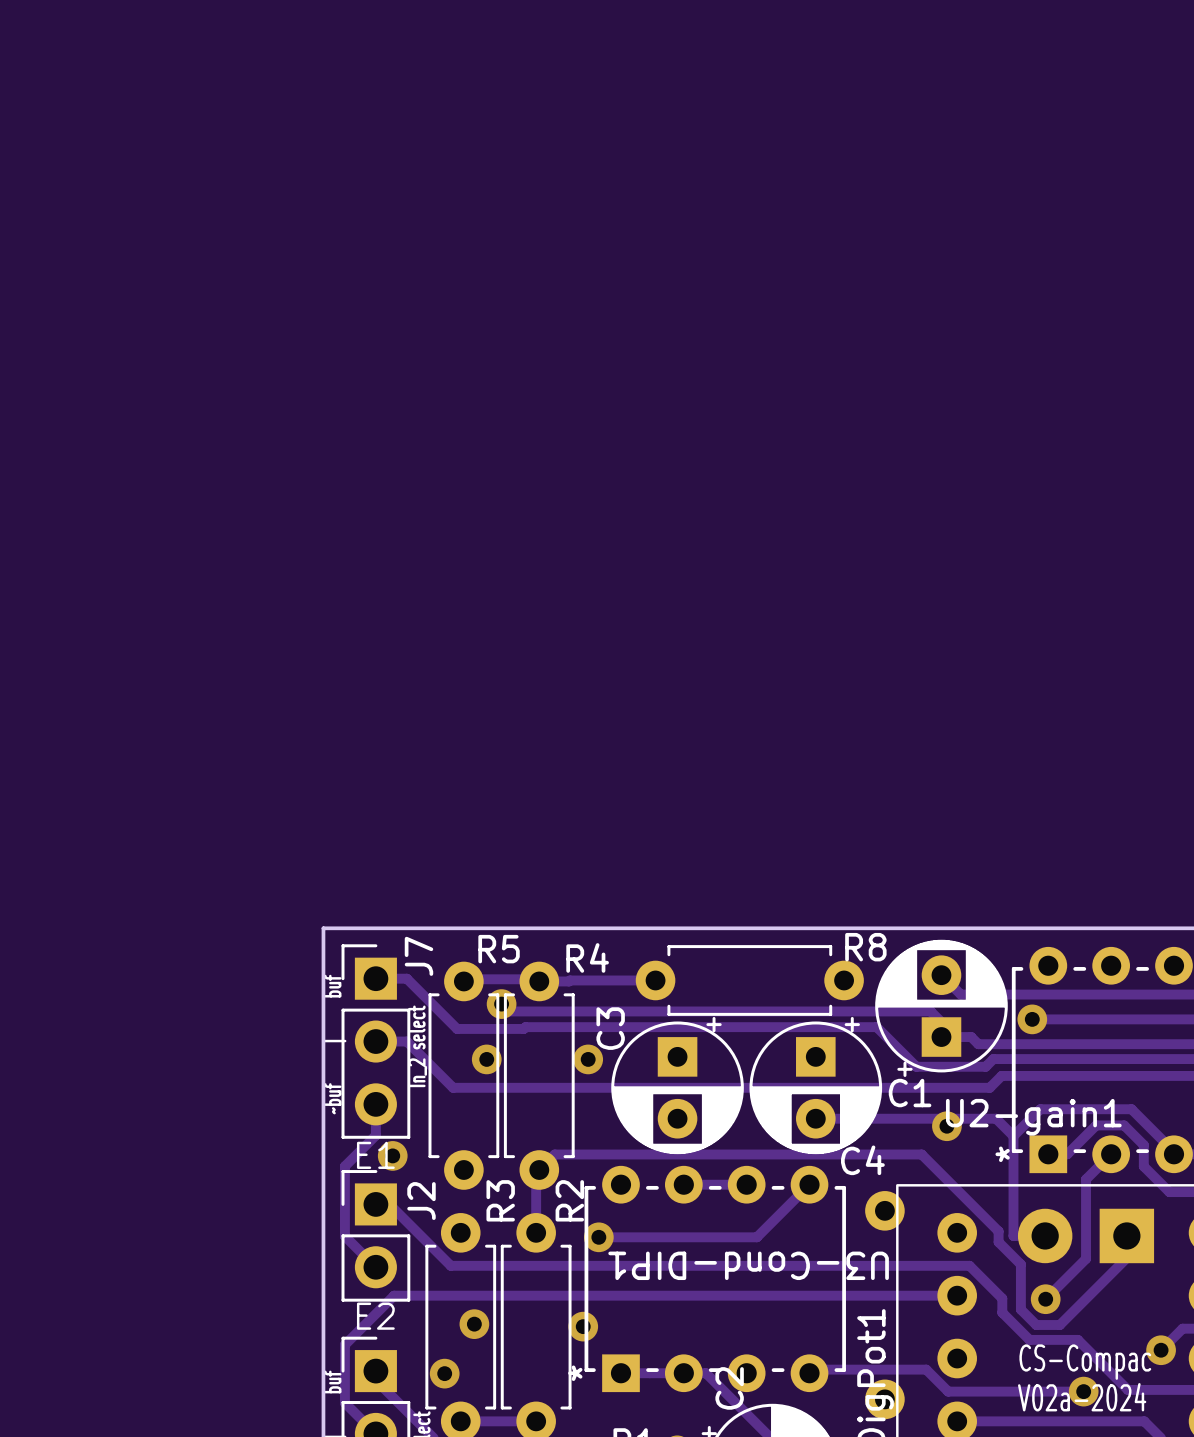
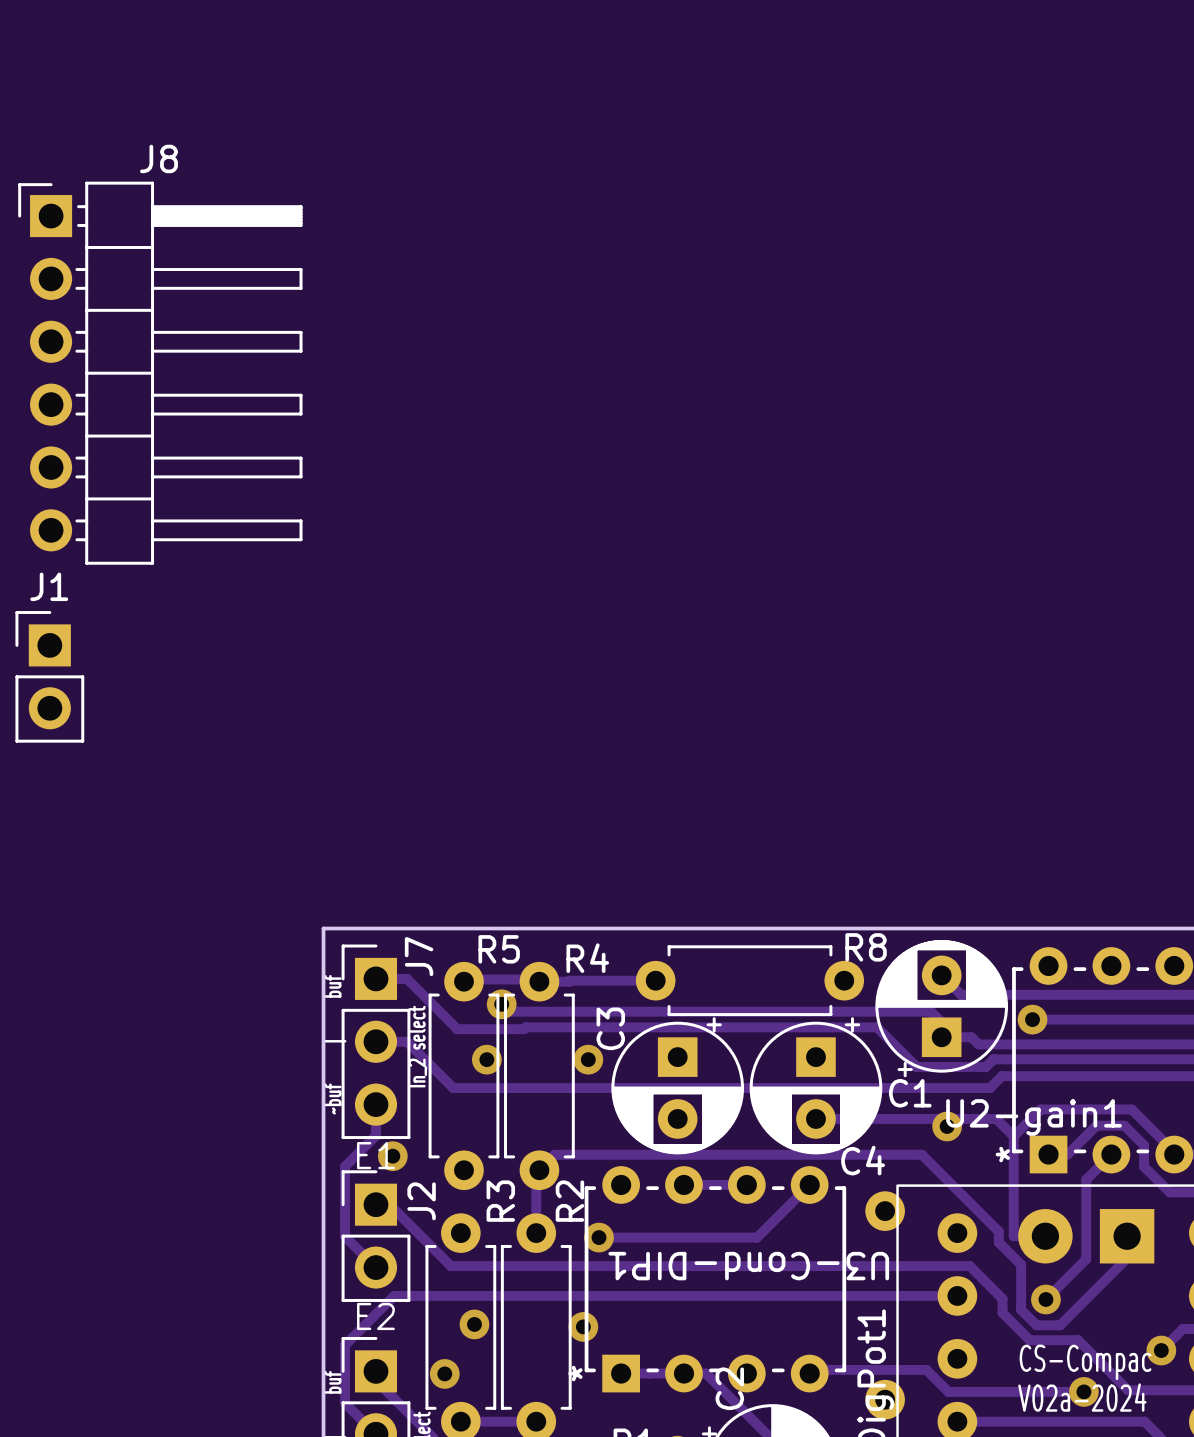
J8: none -> (160, 373)
J1: none -> (49, 676)

